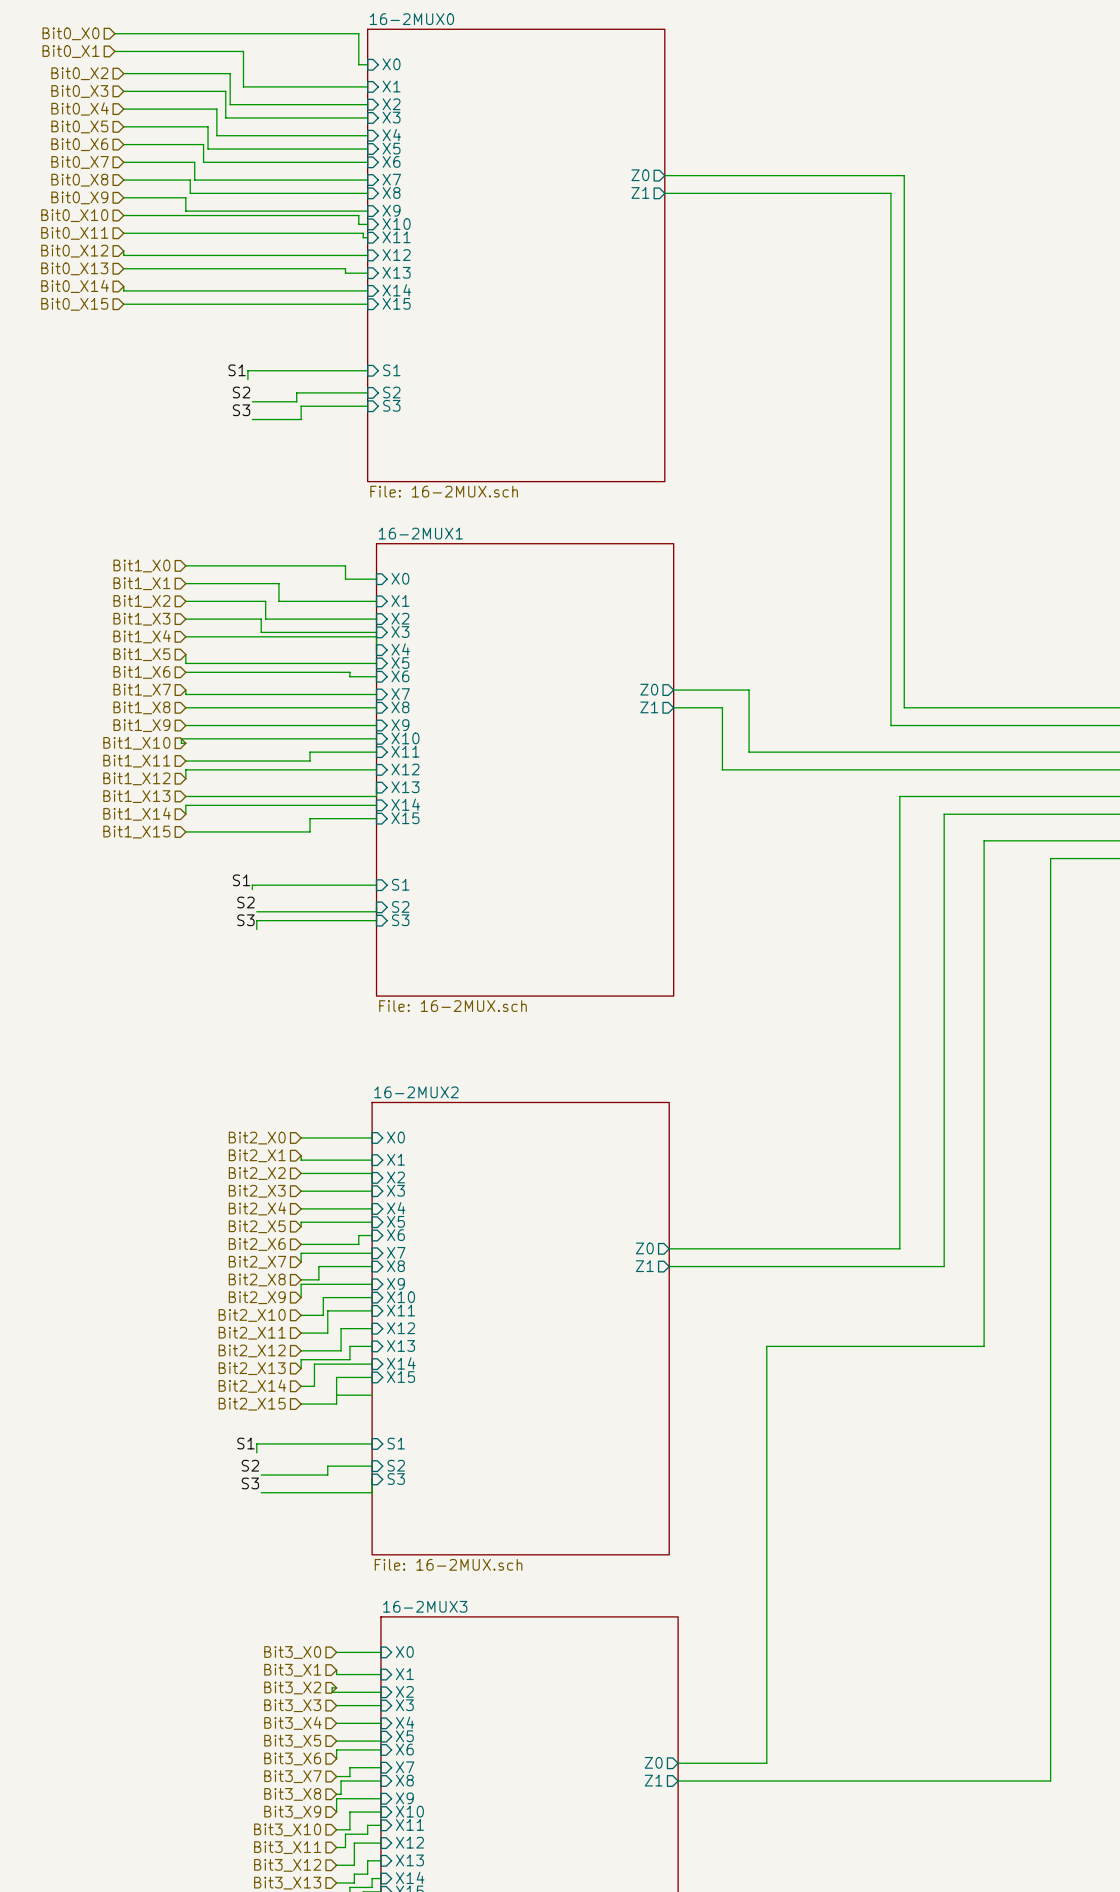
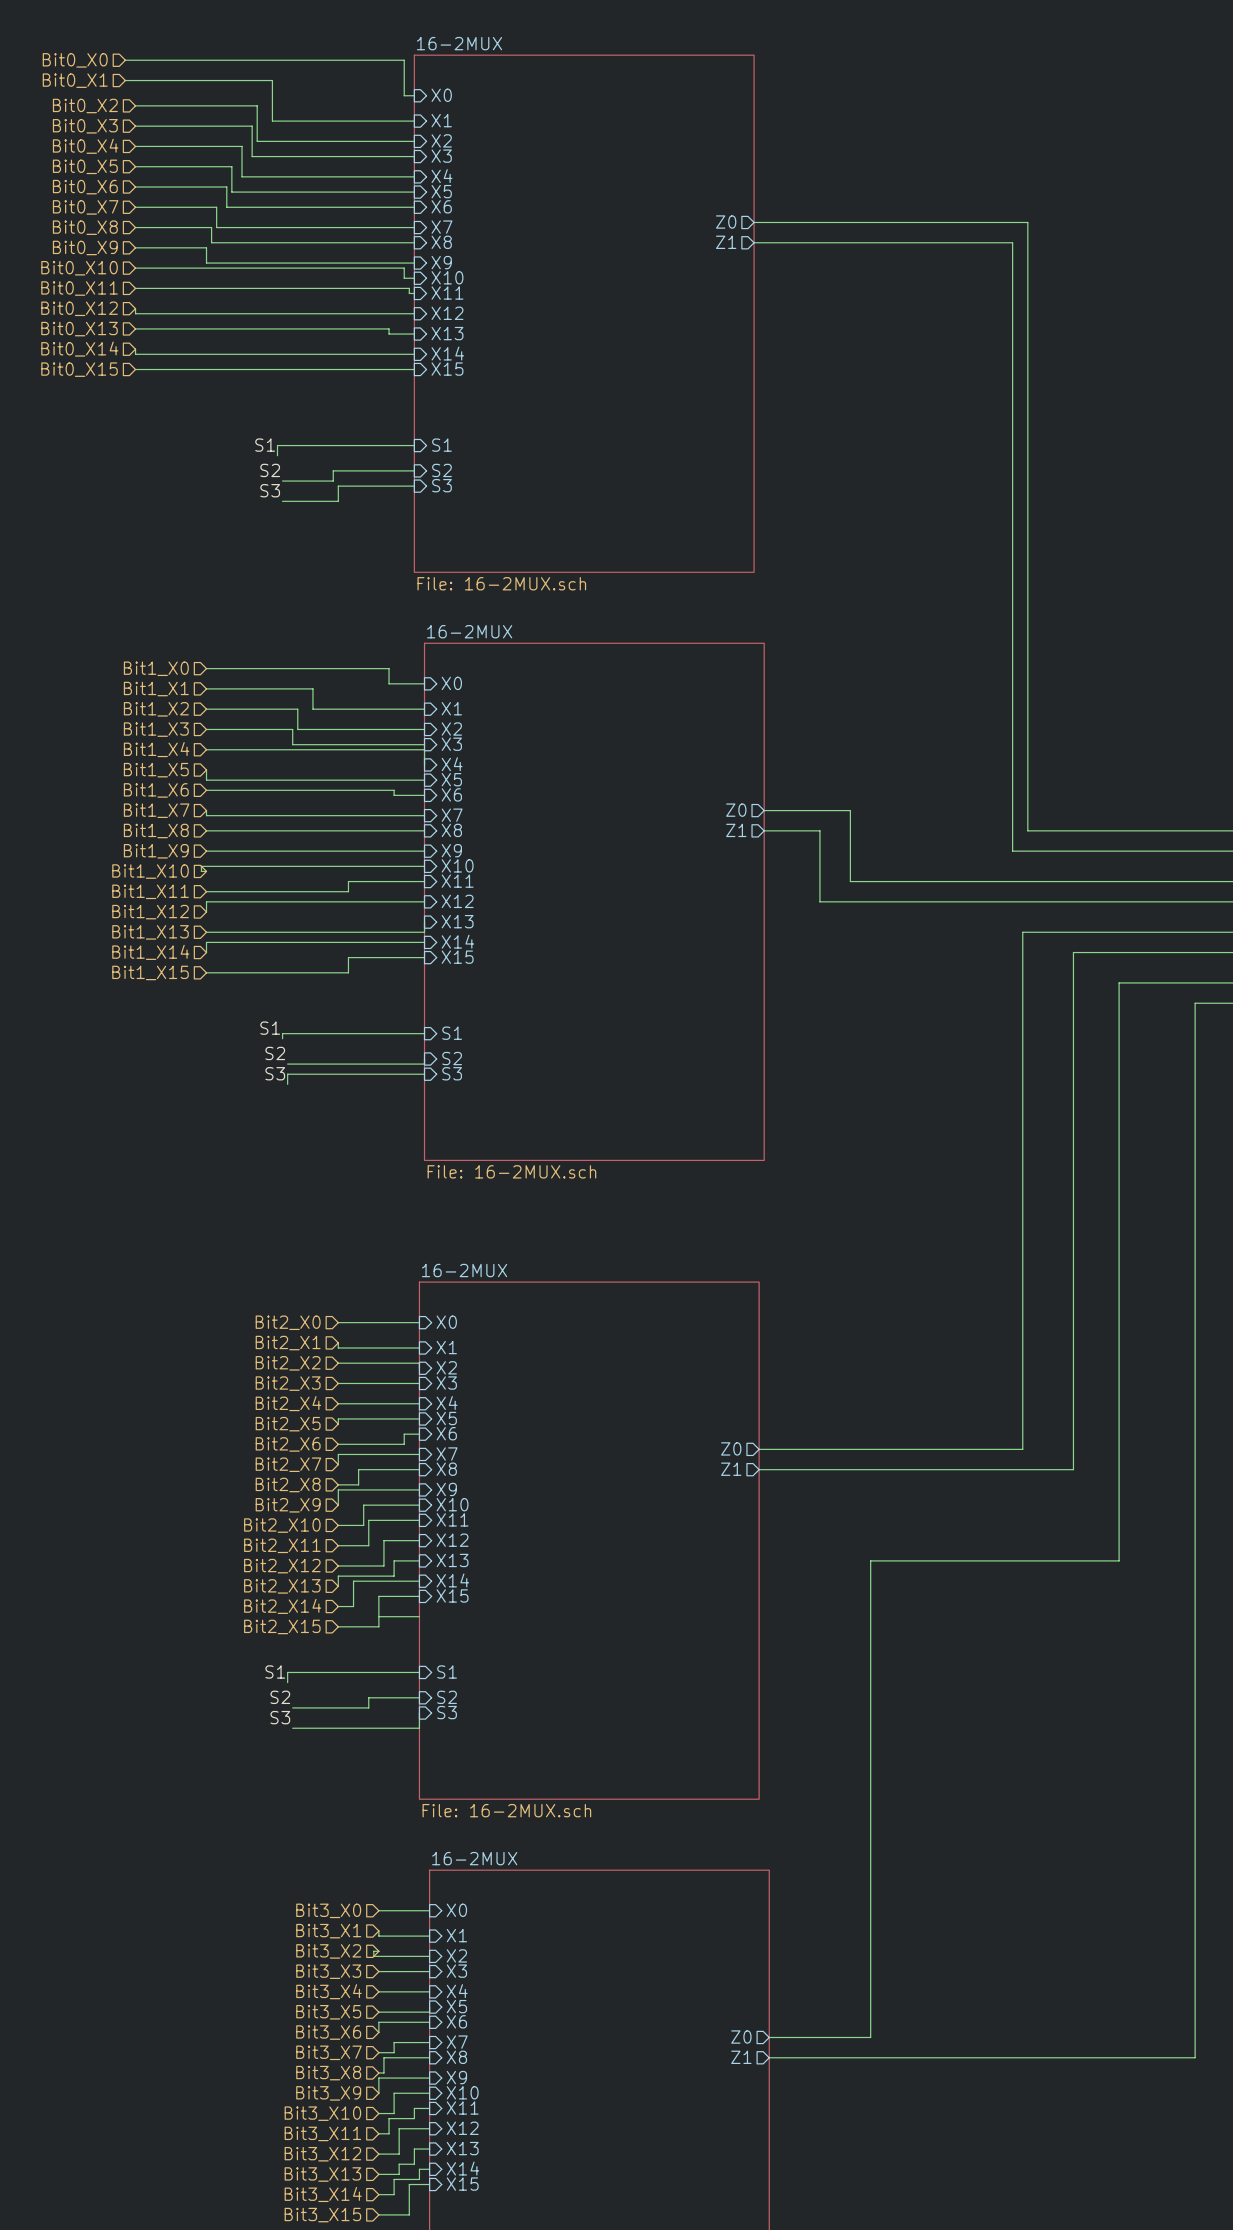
sheet 16-2MUX0 name: 16-2MUX0 (411, 19) -> 16-2MUX (459, 43)
sheet 16-2MUX1 name: 16-2MUX1 (420, 533) -> 16-2MUX (469, 631)
sheet 16-2MUX2 name: 16-2MUX2 (416, 1092) -> 16-2MUX (464, 1270)
sheet 16-2MUX3 name: 16-2MUX3 (425, 1606) -> 16-2MUX (474, 1858)

